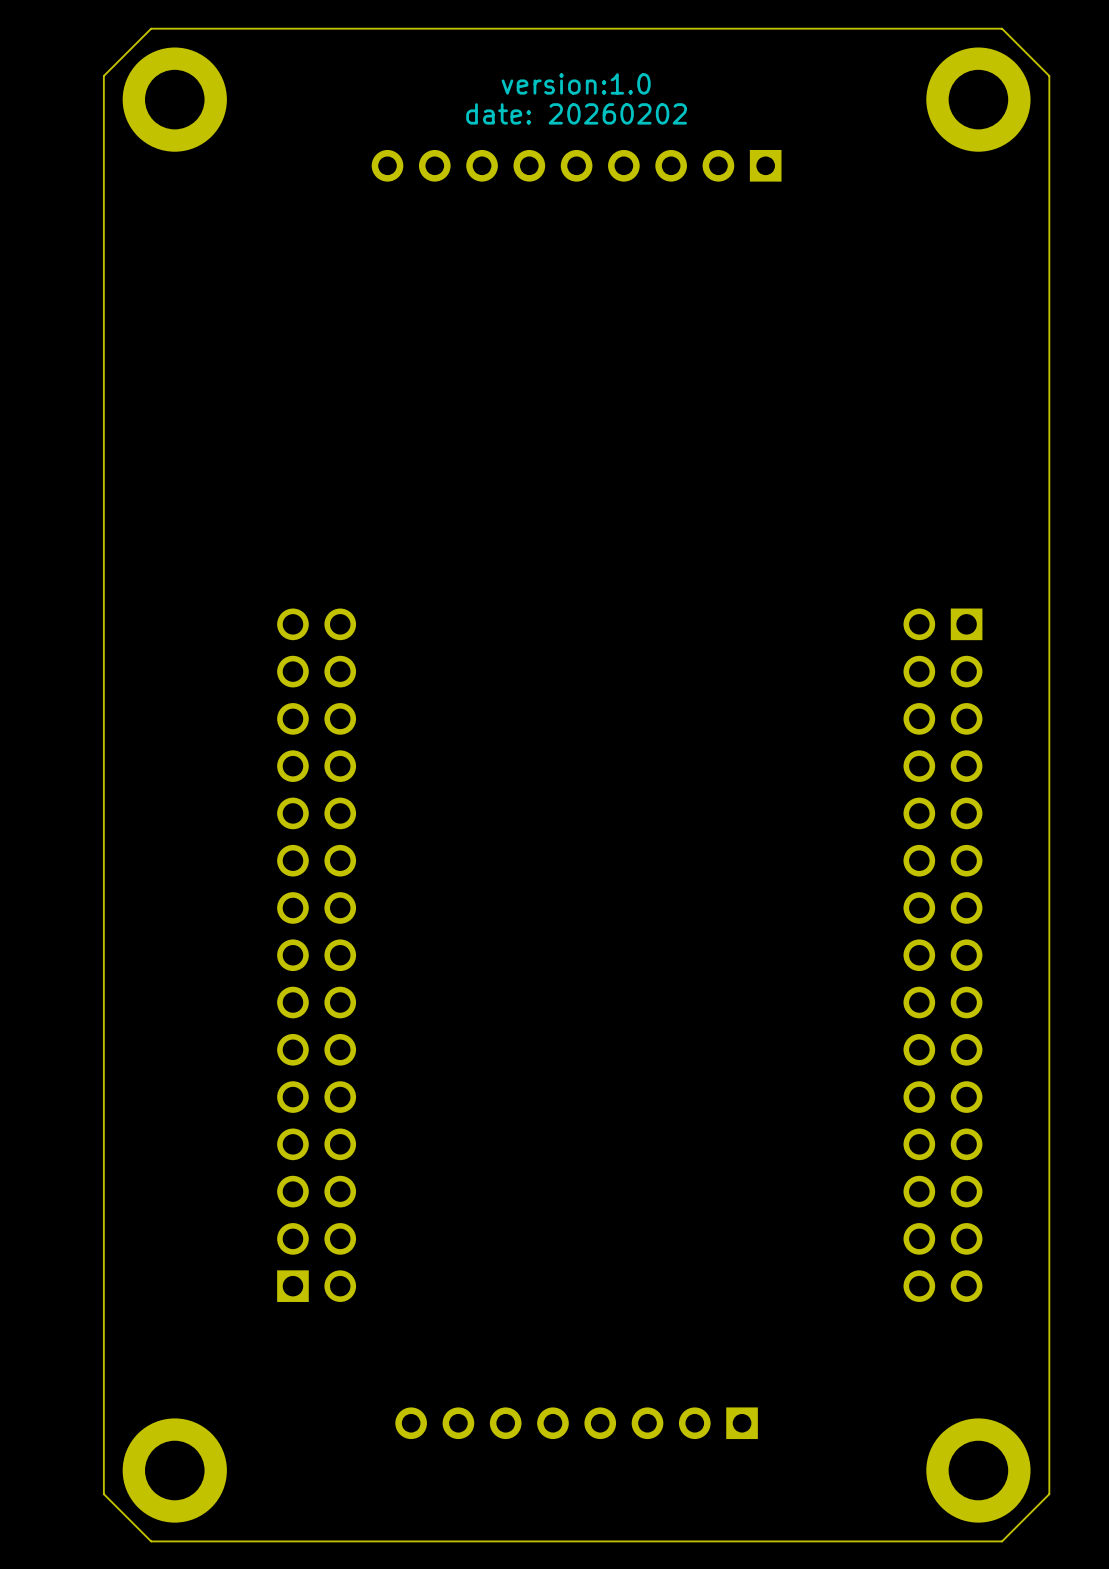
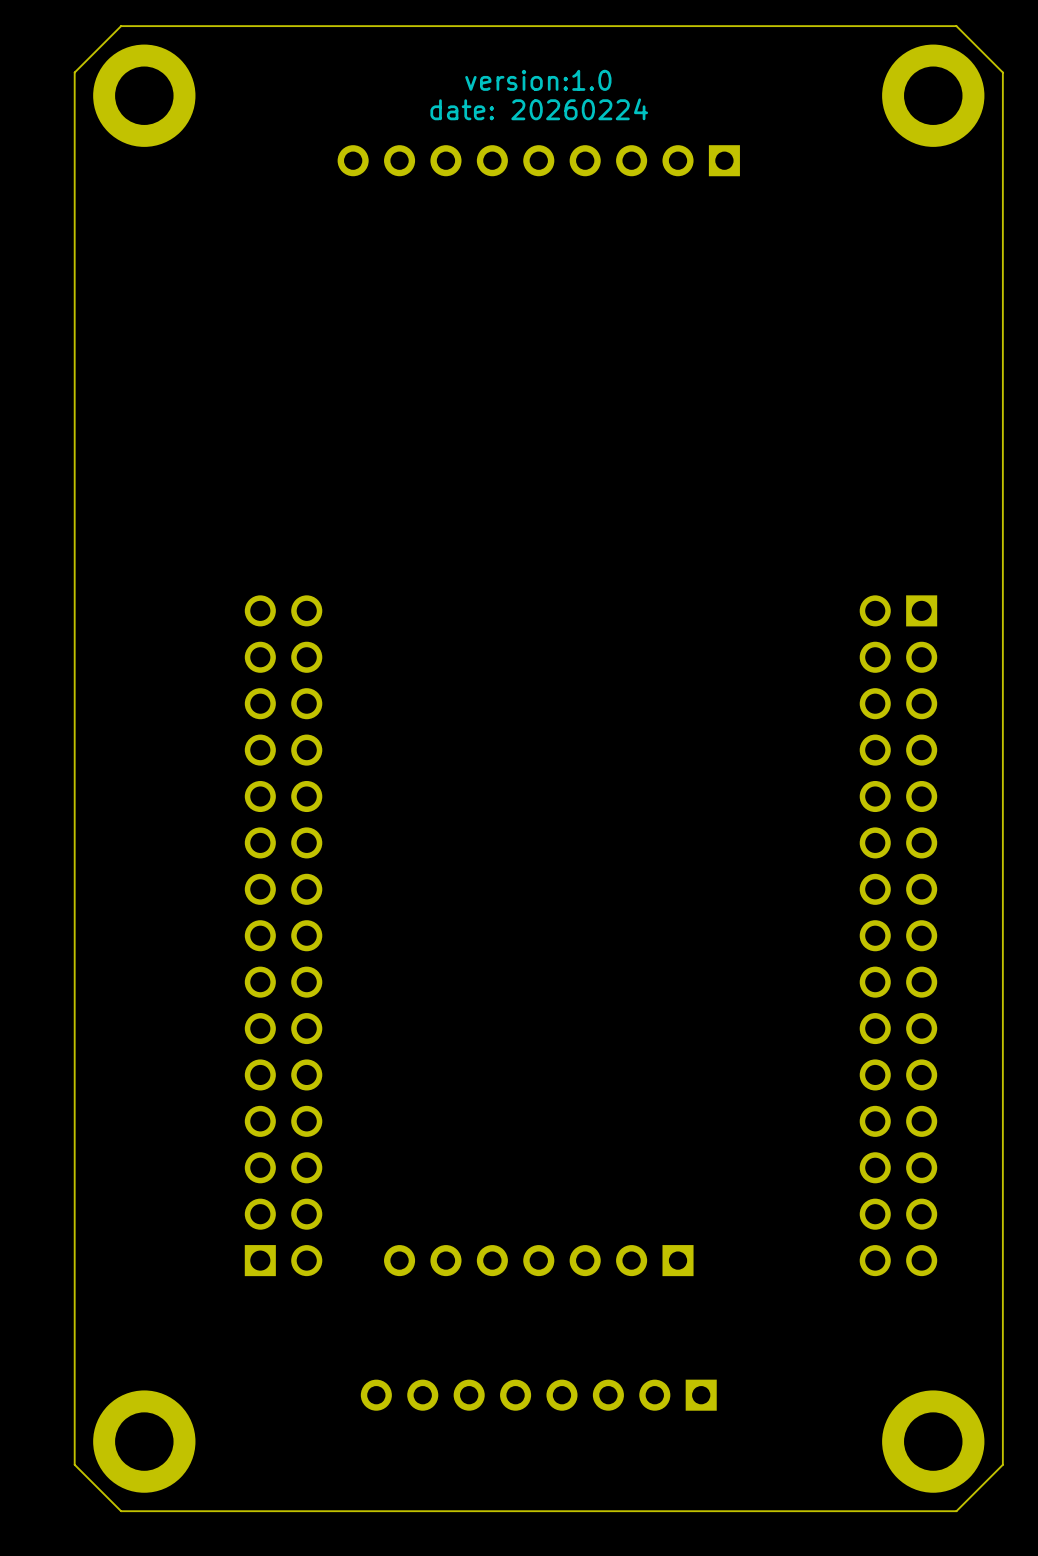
text: date: 20260202 (576, 113) -> date: 20260224 (539, 109)
part: none -> (538, 1260)

